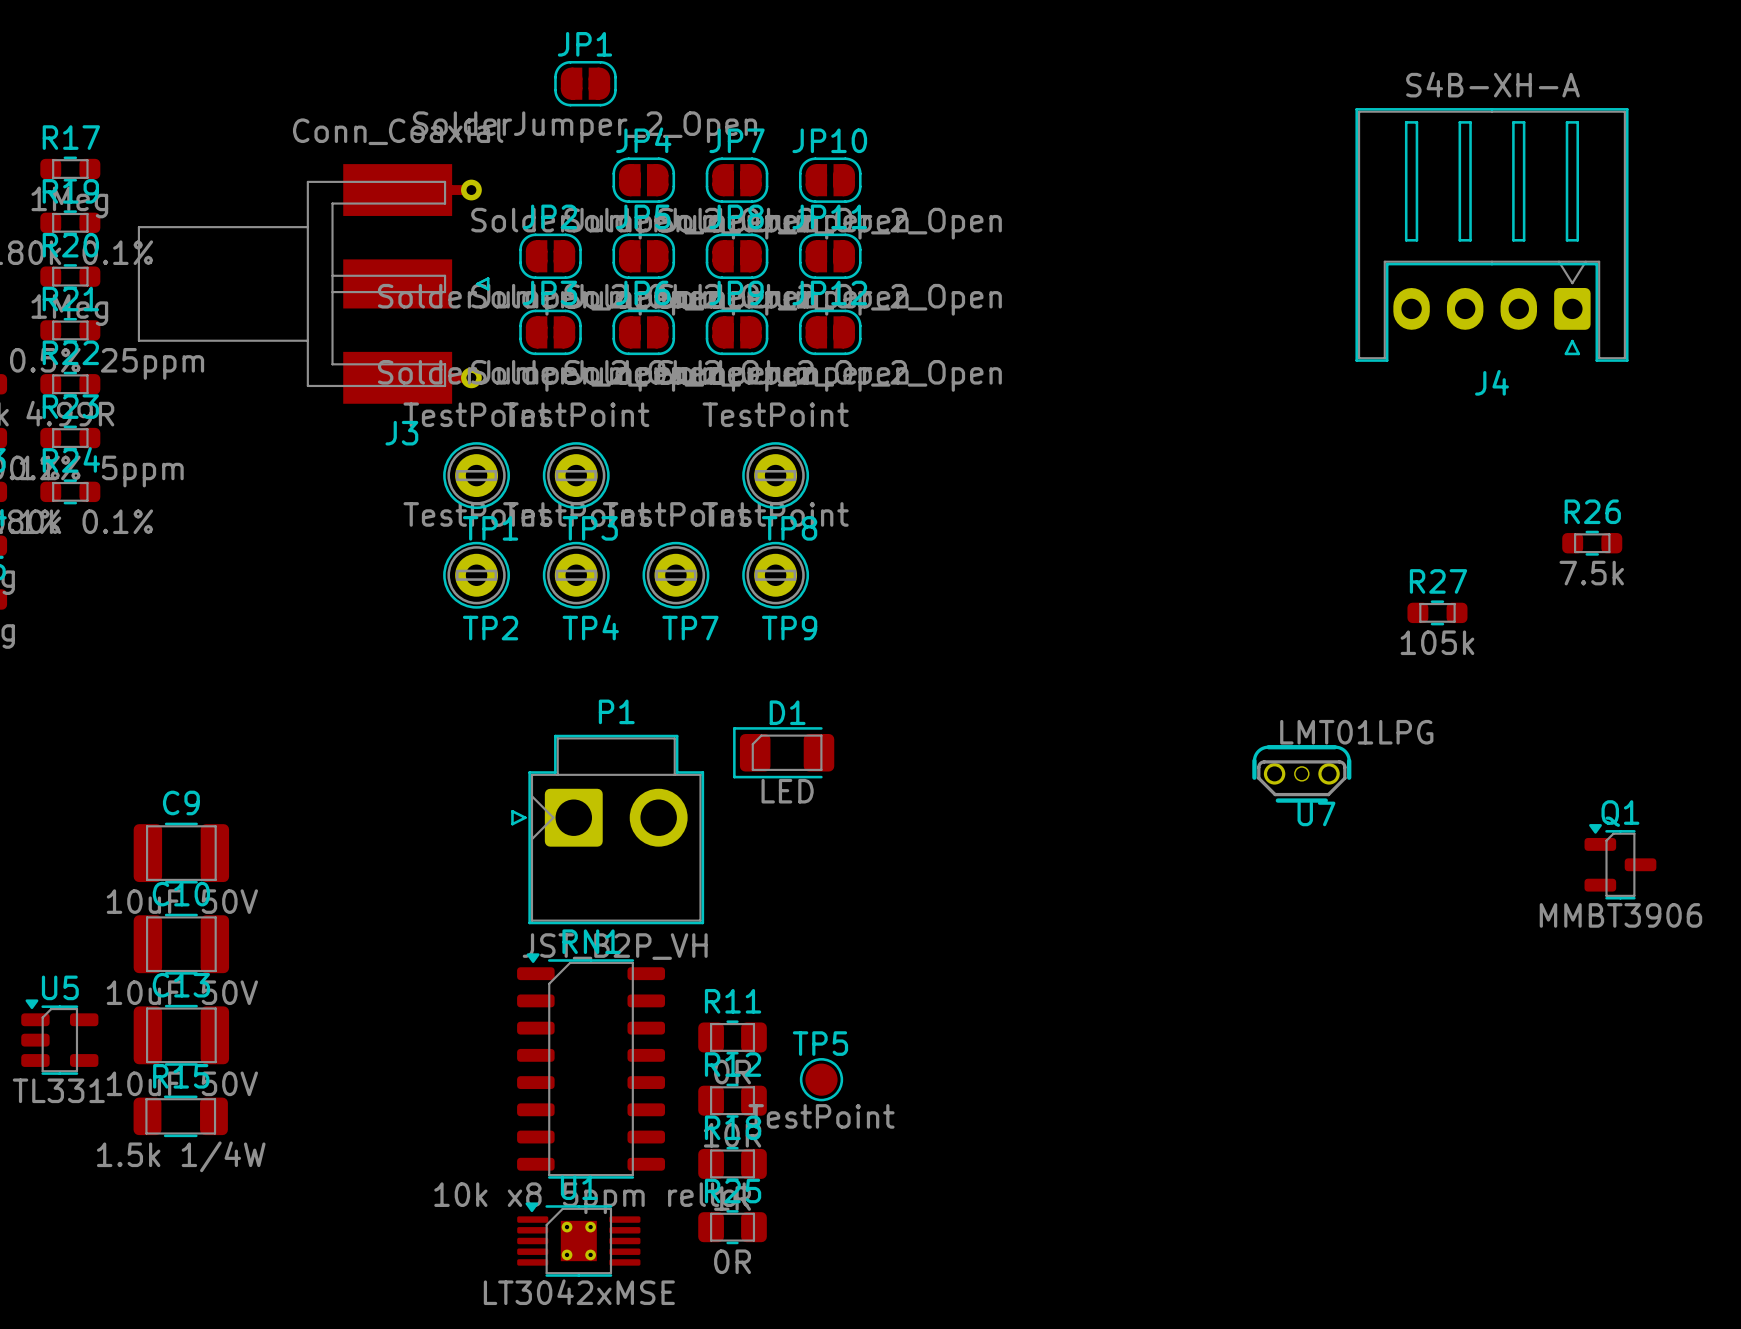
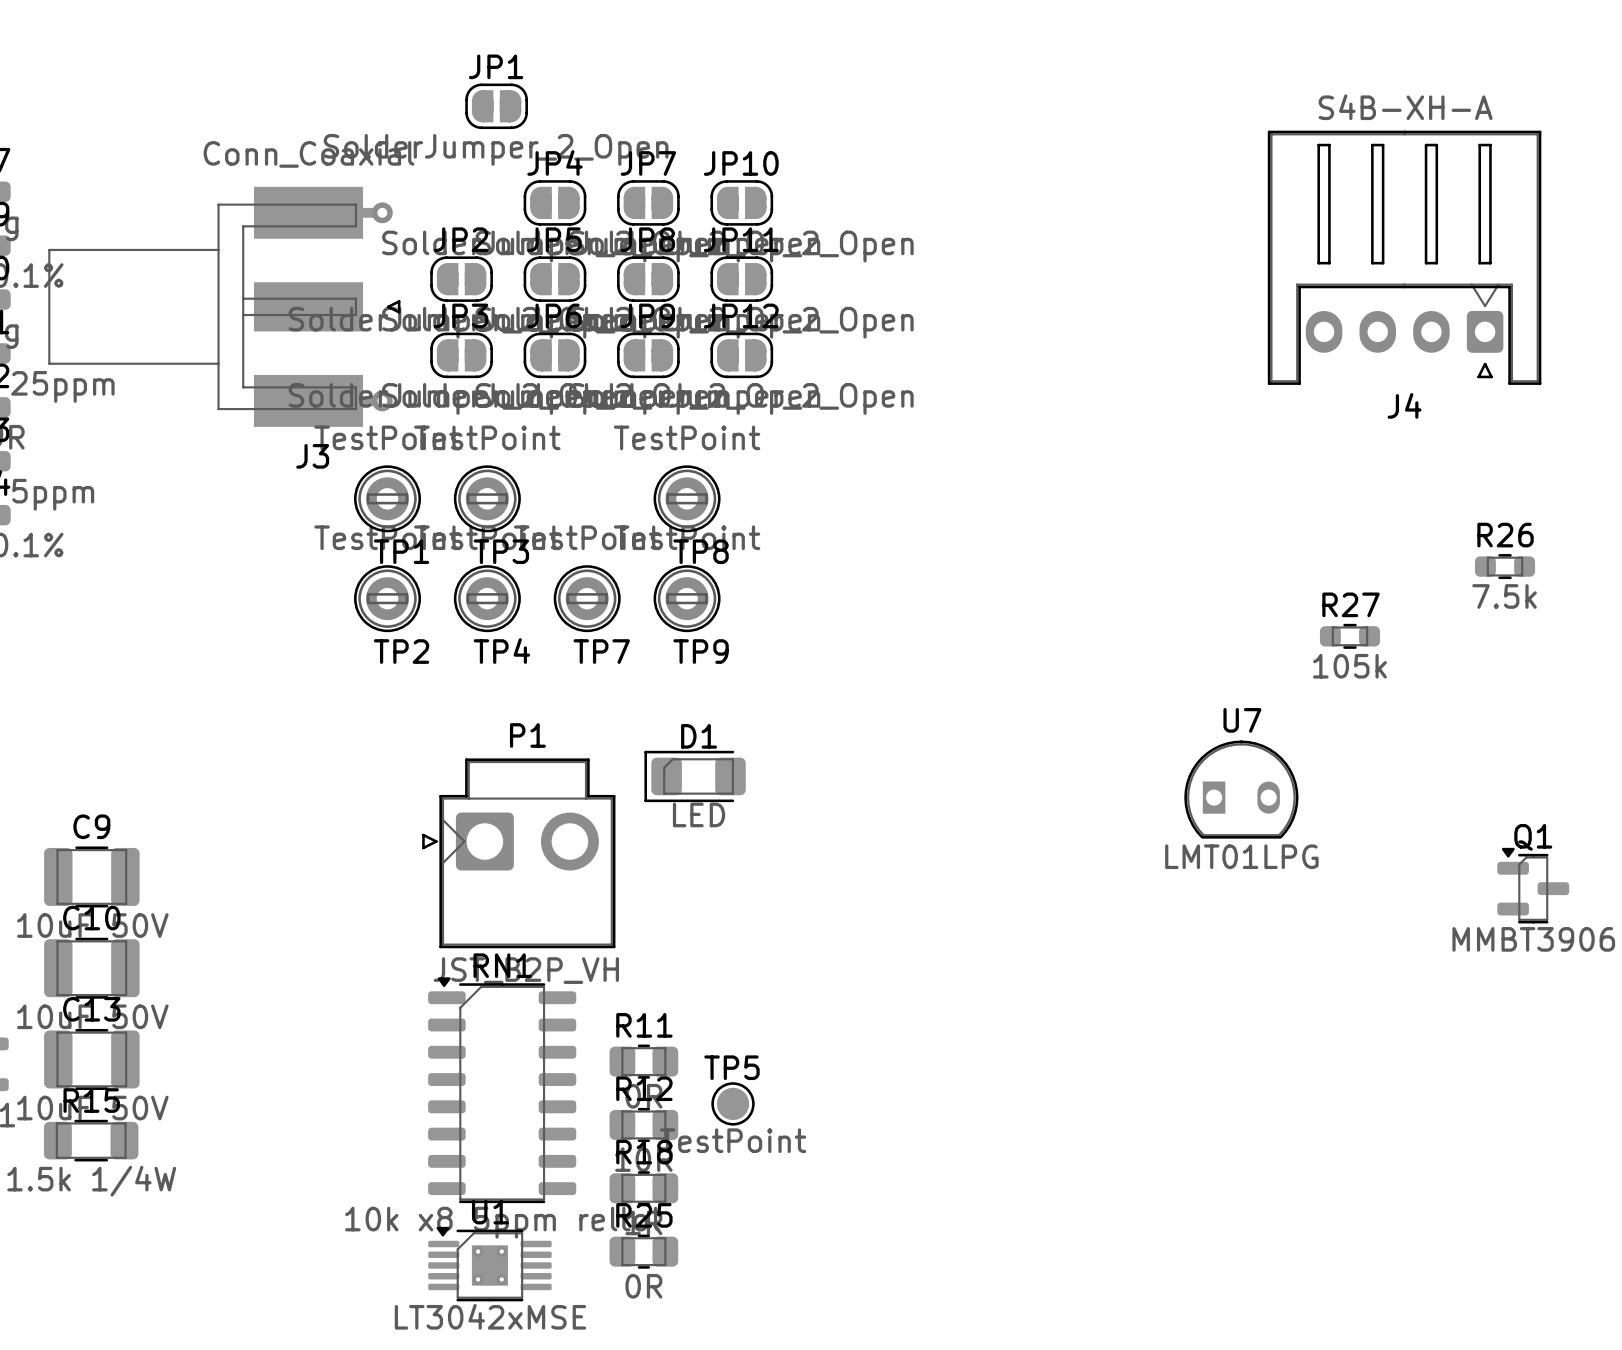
U7 value position: LMT01LPG (1356, 732) -> LMT01LPG (1241, 856)
U7 footprint: [1252, 745, 1352, 803] -> [1184, 740, 1299, 839]
U7 name position: U7 (1316, 813) -> U7 (1242, 720)

